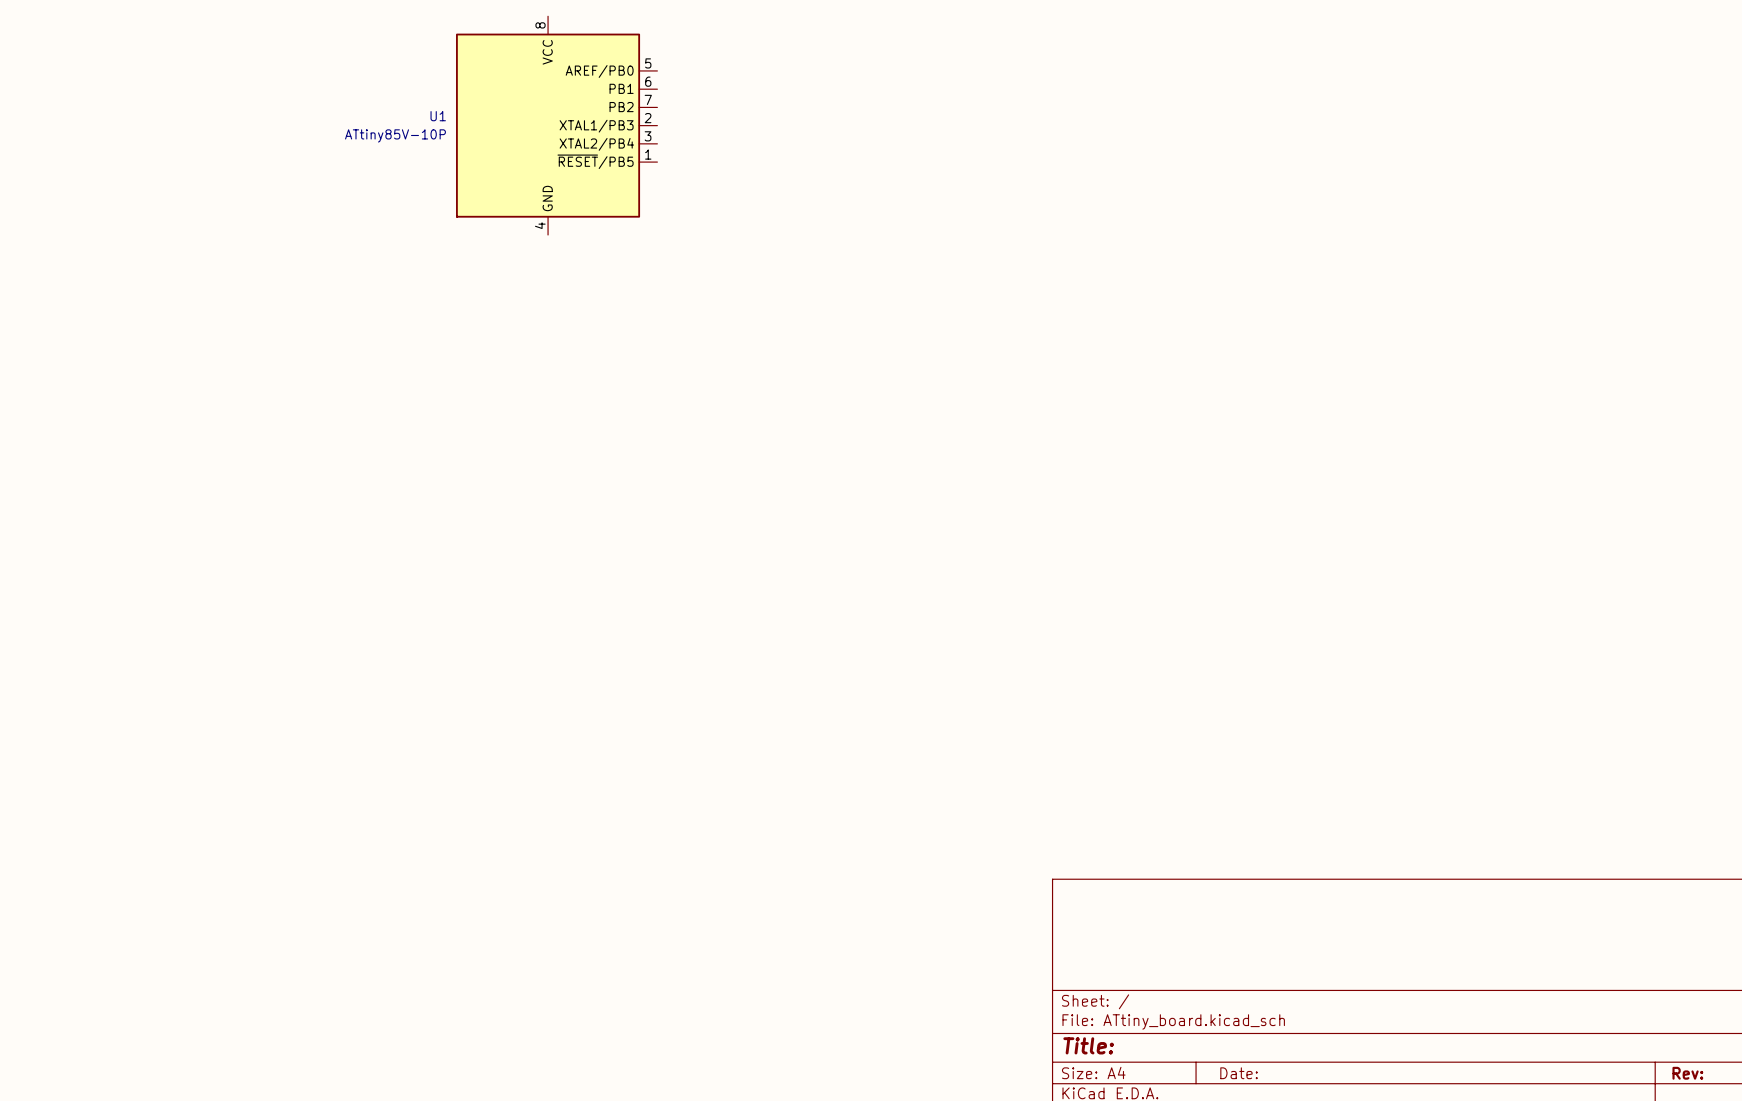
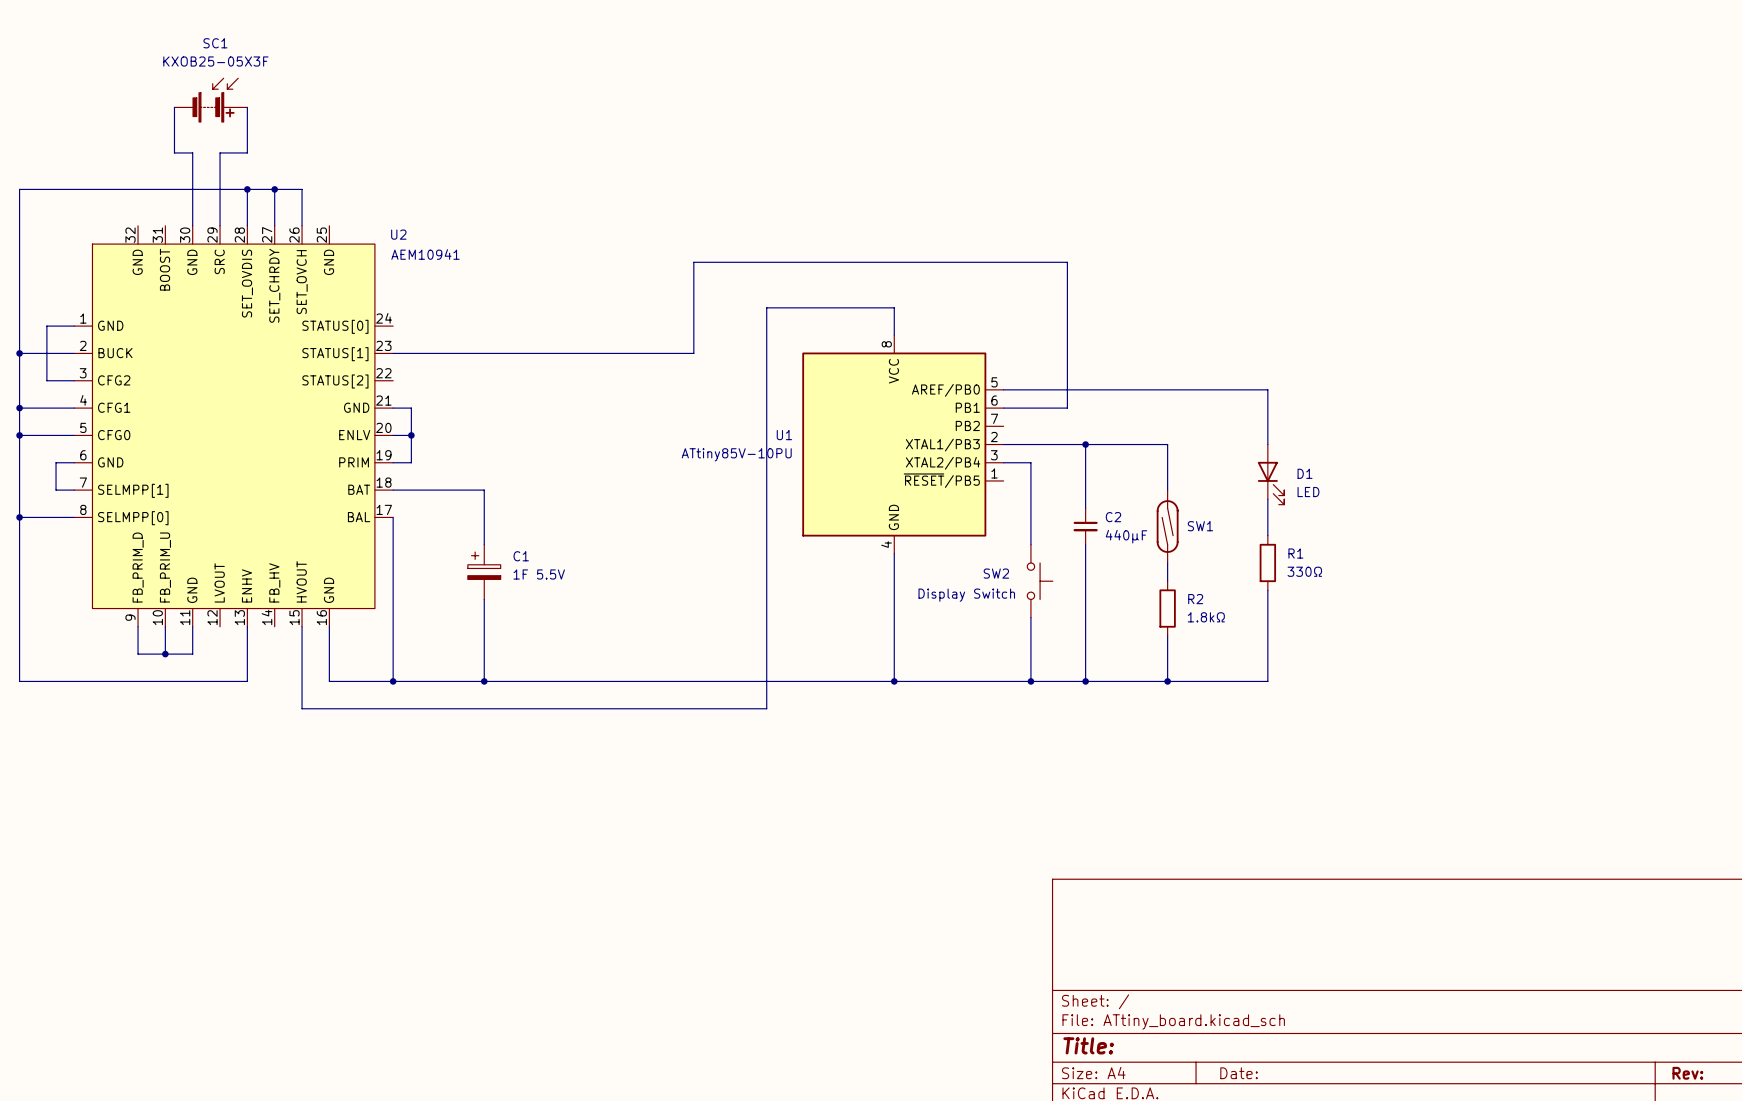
SC1: none -> KXOB25-05X3F (210, 100)
wire: none -> (174, 107) (174, 152) (192, 152) (192, 225)
wire: none -> (247, 107) (247, 152) (220, 152) (220, 225)
U1 position: (556, 125) -> (902, 444)
U1 value: ATtiny85V-10P (395, 135) -> ATtiny85V-10PU (736, 454)
wire: none -> (247, 189) (247, 225)
junction: none -> (247, 189)
wire: none -> (274, 189) (274, 225)
junction: none -> (274, 189)
wire: none -> (302, 225) (302, 189) (19, 189) (19, 681) (247, 681) (247, 626)
text: none -> AEM10941 (425, 254)
wire: none -> (74, 326) (46, 326) (46, 380) (74, 380)
wire: none -> (894, 335) (894, 307) (766, 307) (766, 708) (302, 708) (302, 626)
wire: none -> (19, 353) (74, 353)
junction: none -> (19, 353)
wire: none -> (393, 353) (693, 353) (693, 262) (1067, 262) (1067, 408) (1003, 408)
wire: none -> (1003, 389) (1267, 389) (1267, 444)
wire: none -> (19, 408) (74, 408)
junction: none -> (19, 408)
wire: none -> (393, 408) (411, 408) (411, 462) (393, 462)
U2: none -> (233, 426)
wire: none -> (19, 435) (74, 435)
junction: none -> (19, 435)
wire: none -> (393, 435) (411, 435)
junction: none -> (411, 435)
wire: none -> (1003, 444) (1167, 444) (1167, 490)
wire: none -> (1085, 444) (1085, 508)
junction: none -> (1085, 444)
wire: none -> (74, 462) (56, 462) (56, 490) (74, 490)
wire: none -> (1003, 462) (1030, 462) (1030, 544)
D1: none -> LED (1271, 474)
wire: none -> (393, 490) (484, 490) (484, 544)
wire: none -> (1267, 499) (1267, 535)
wire: none -> (19, 517) (74, 517)
junction: none -> (19, 517)
wire: none -> (393, 517) (393, 681)
C2: none -> 440μF (1085, 526)
SW1: none -> (1167, 526)
wire: none -> (1085, 544) (1085, 681)
wire: none -> (894, 553) (894, 681)
wire: none -> (1167, 562) (1167, 581)
R1: none -> 330Ω (1267, 562)
C1: none -> 1F 5.5V (484, 572)
SW2: none -> Display Switch (1040, 581)
wire: none -> (1267, 590) (1267, 681) (329, 681) (329, 626)
wire: none -> (484, 599) (484, 681)
R2: none -> 1.8kΩ (1167, 608)
wire: none -> (1030, 617) (1030, 681)
wire: none -> (138, 626) (138, 654) (192, 654) (192, 626)
wire: none -> (165, 626) (165, 654)
wire: none -> (1167, 635) (1167, 681)
junction: none -> (165, 654)
junction: none -> (393, 681)
junction: none -> (484, 681)
junction: none -> (894, 681)
junction: none -> (1030, 681)
junction: none -> (1085, 681)
junction: none -> (1167, 681)

